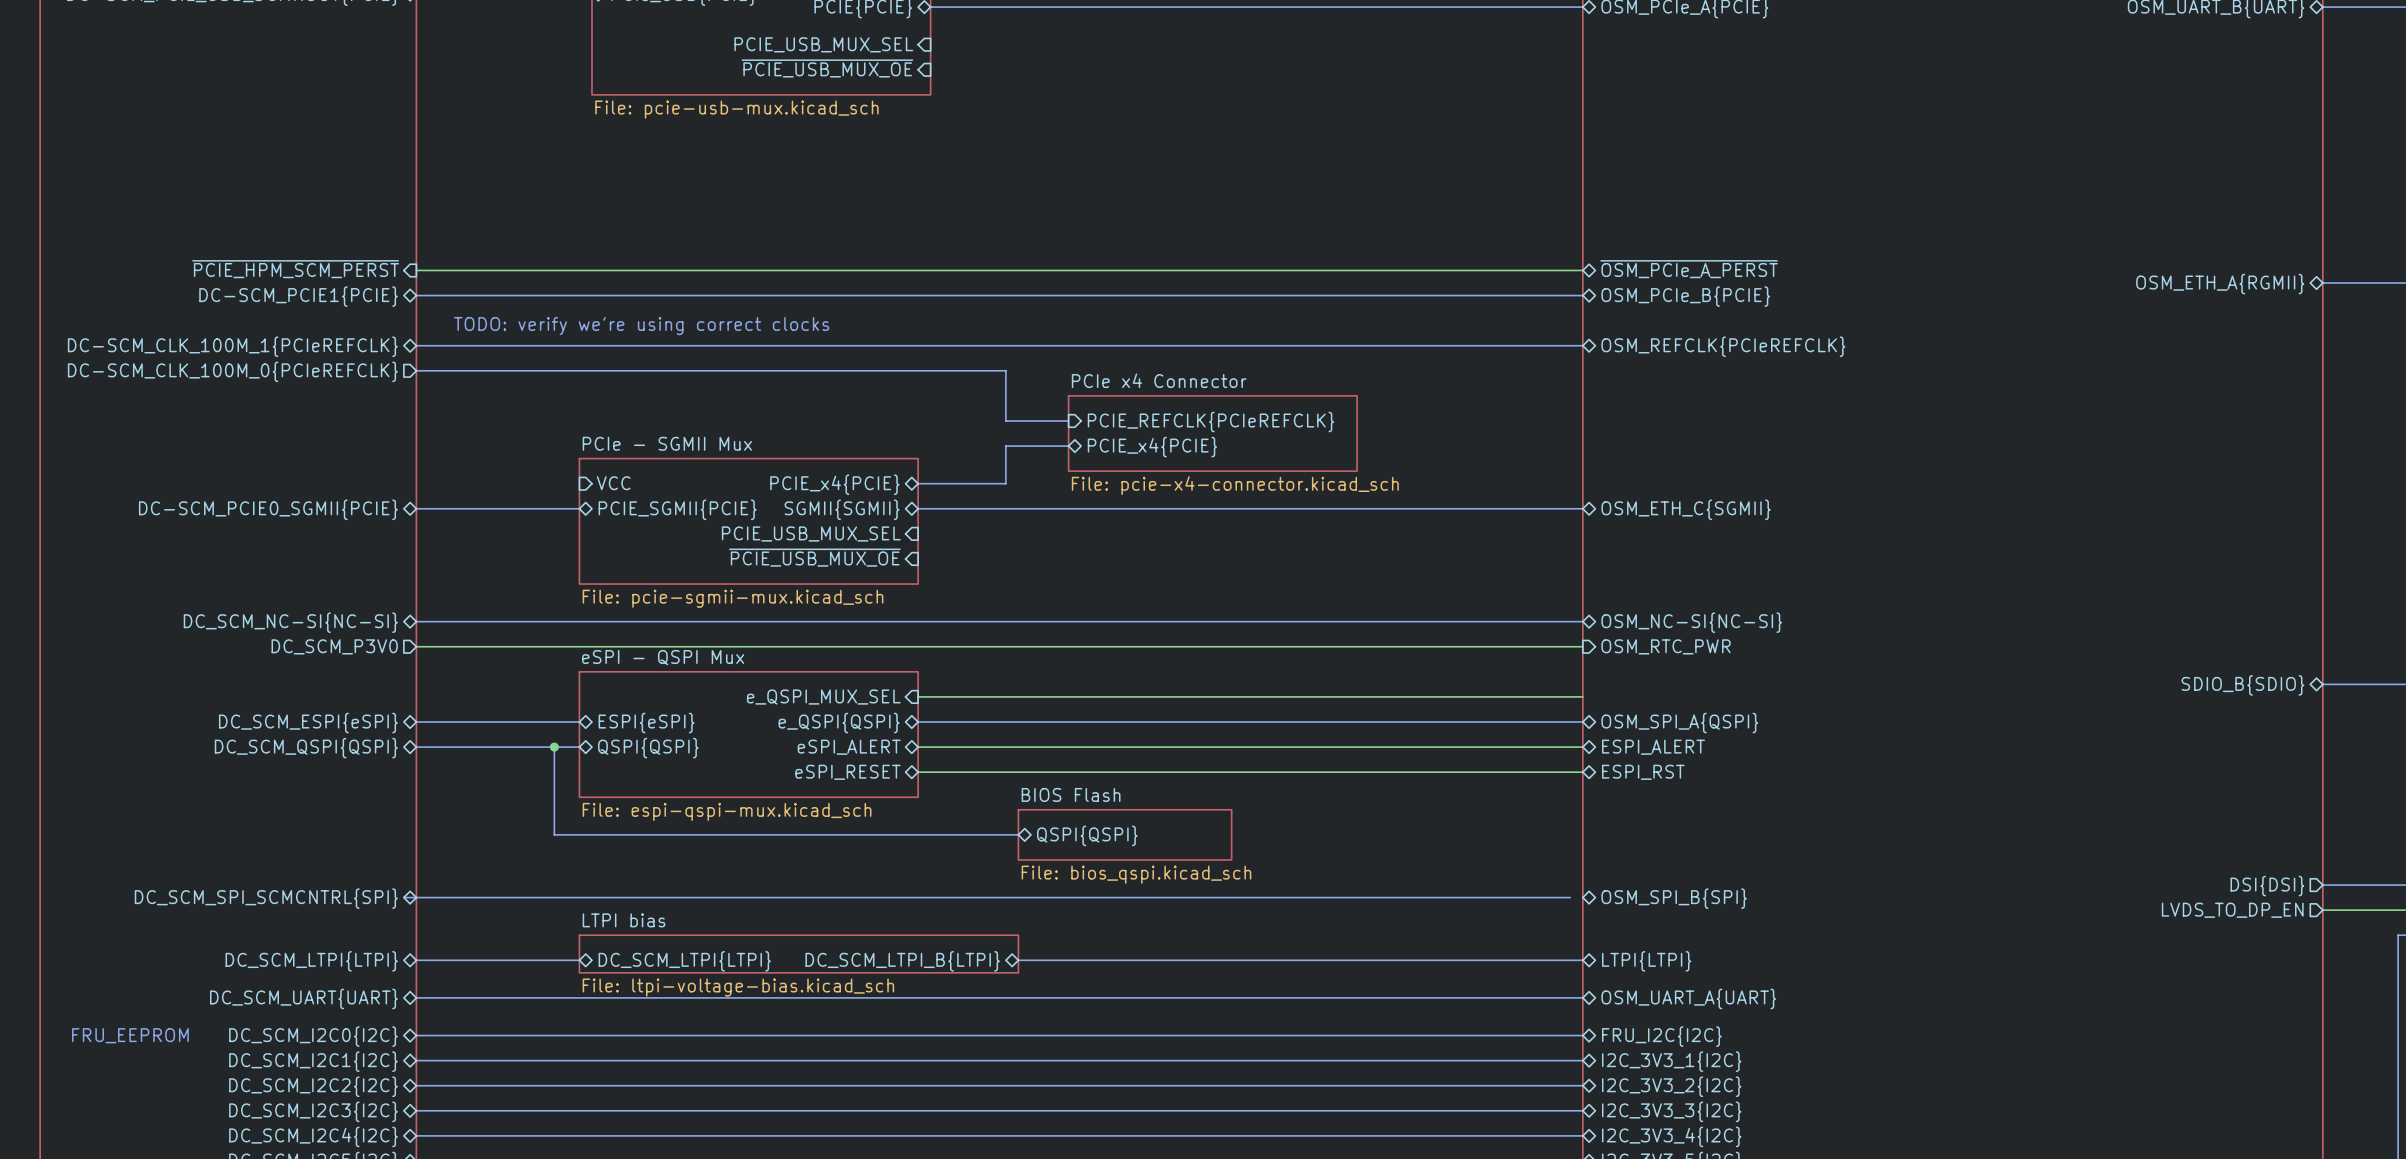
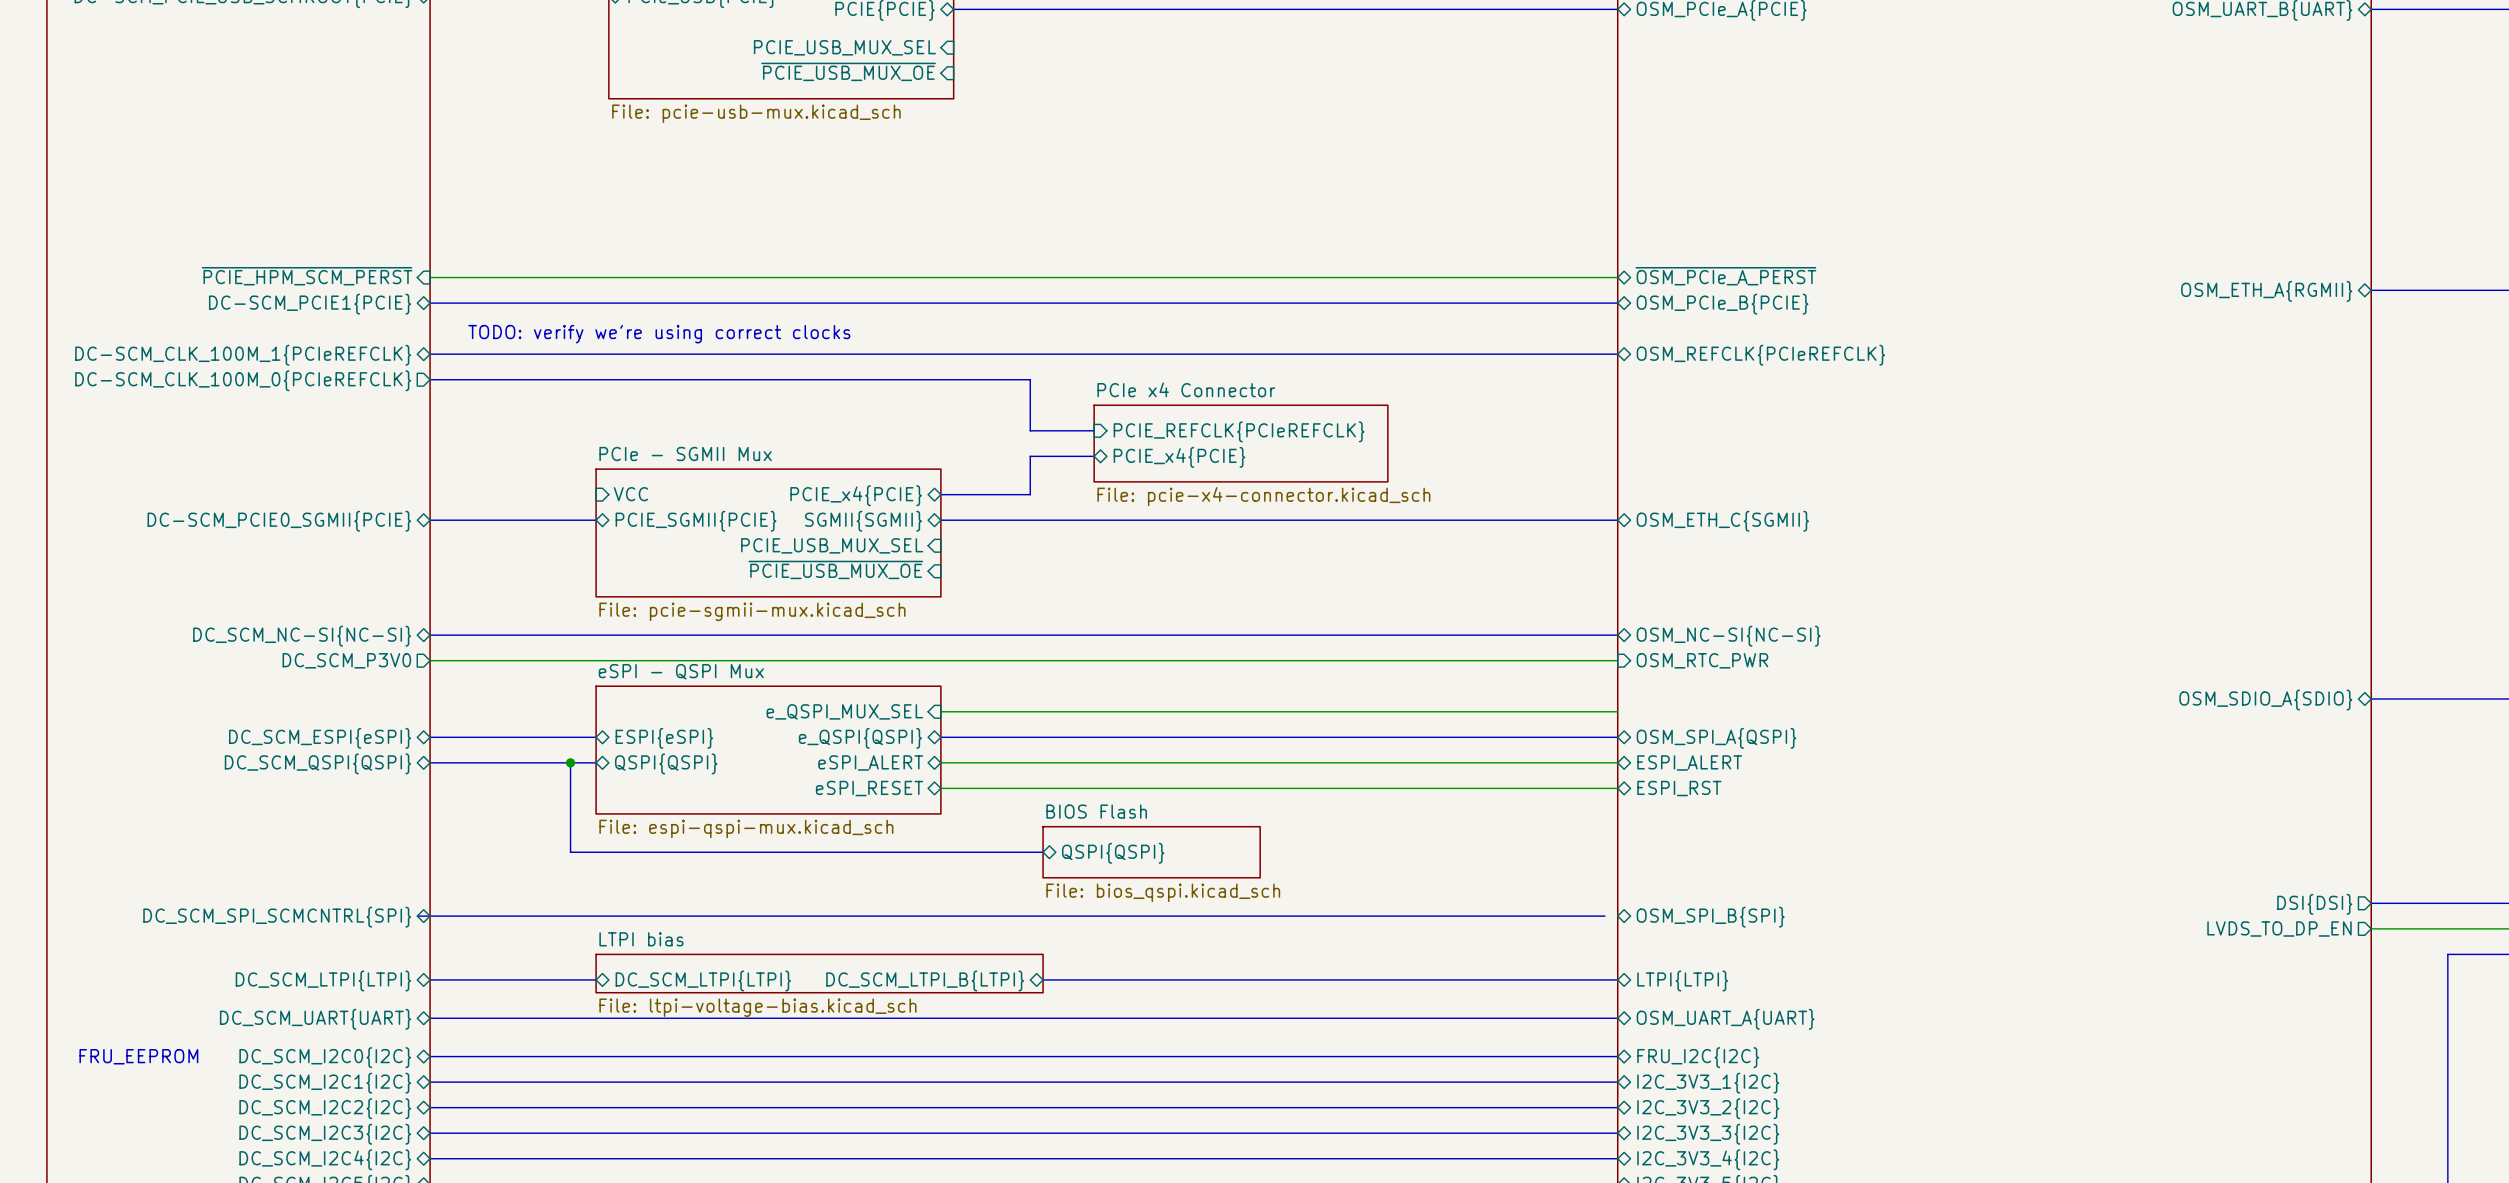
sheet pin: SDIO_B{SDIO} (2242, 685) -> OSM_SDIO_A{SDIO} (2265, 700)

